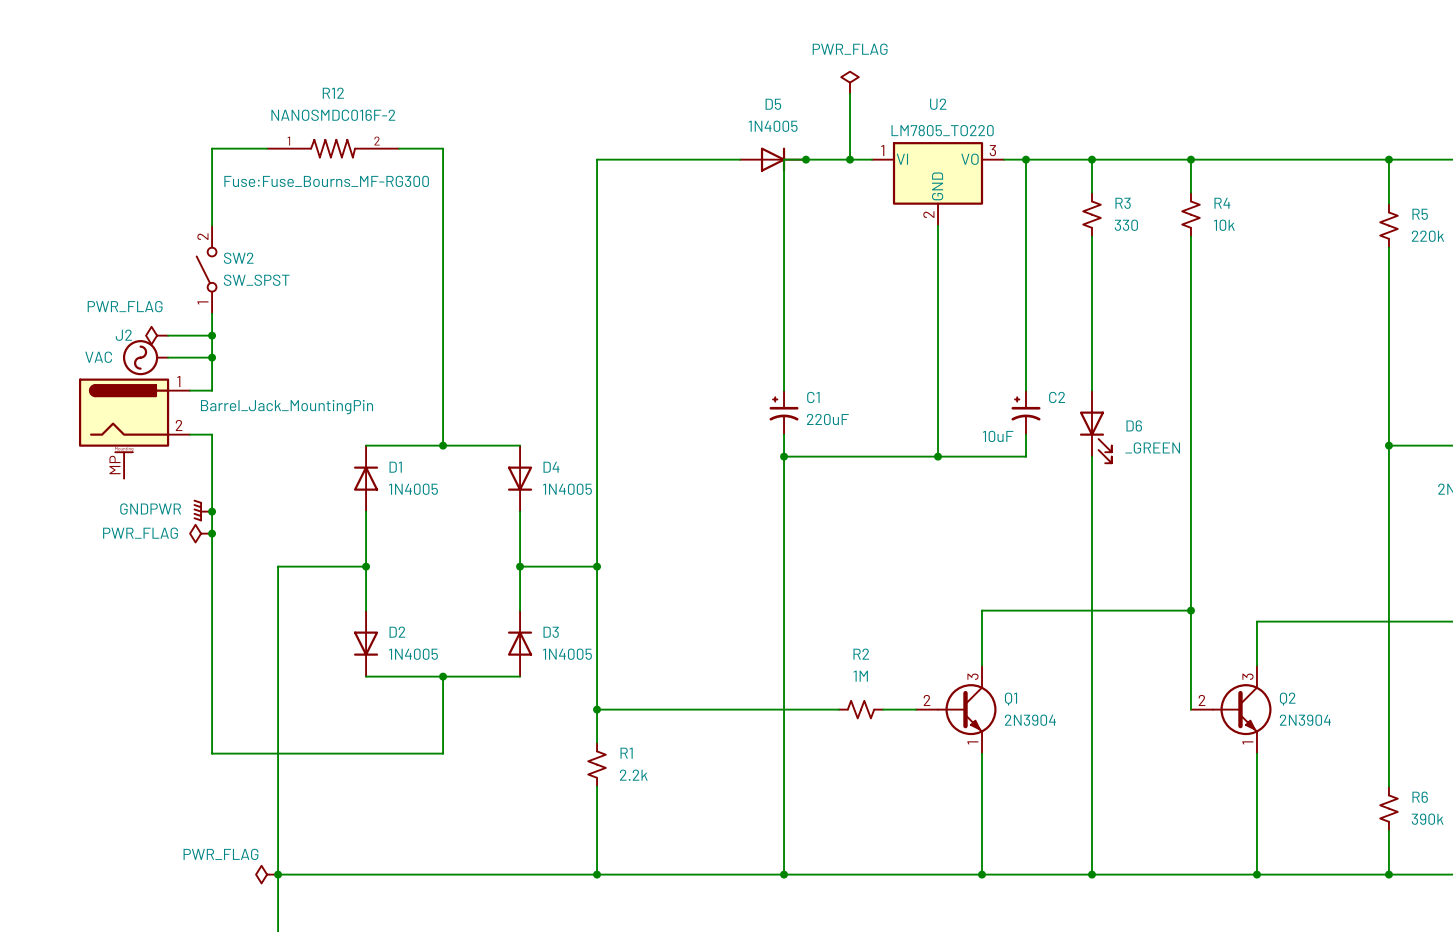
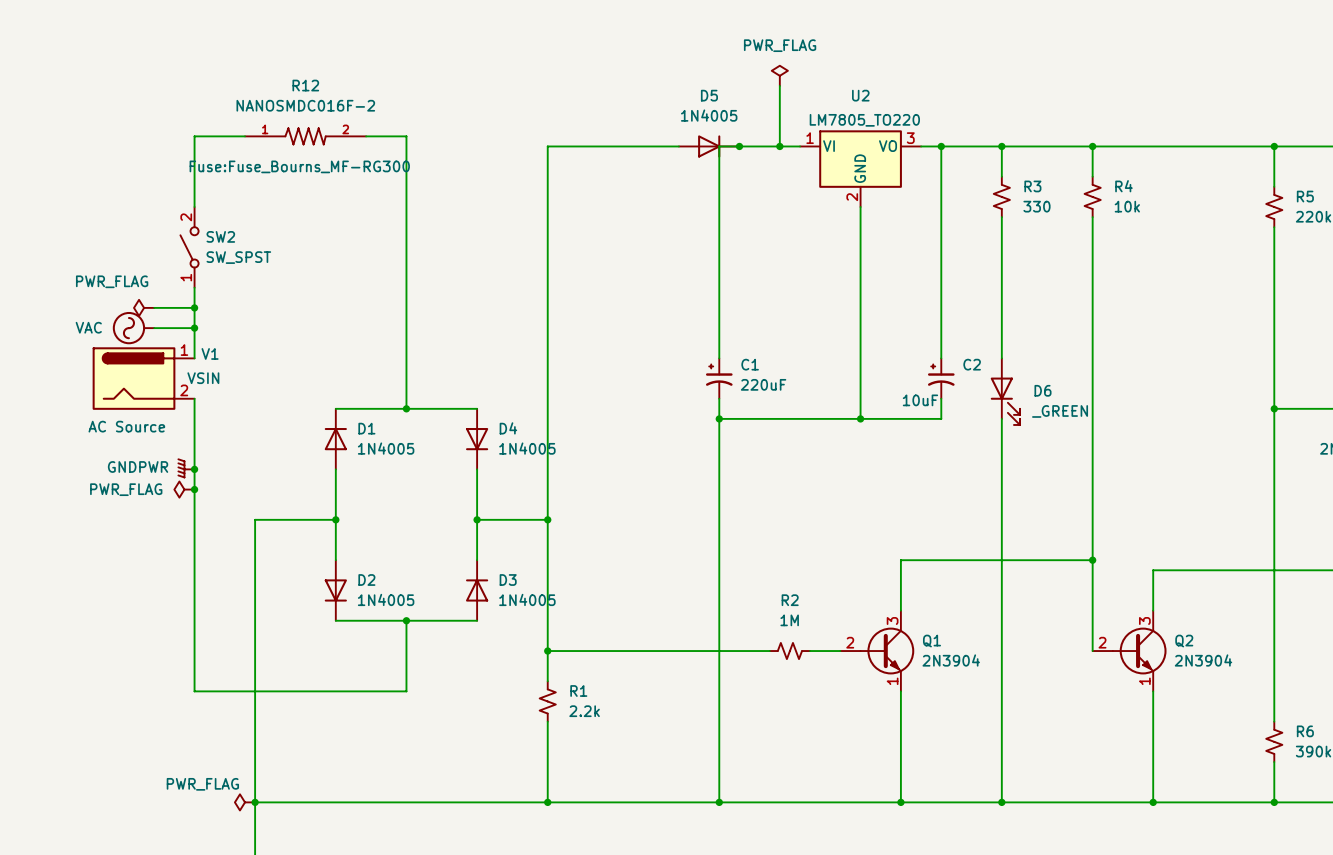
V1: none -> VSIN (143, 378)
J2: Barrel_Jack_MountingPin (134, 428) -> none

